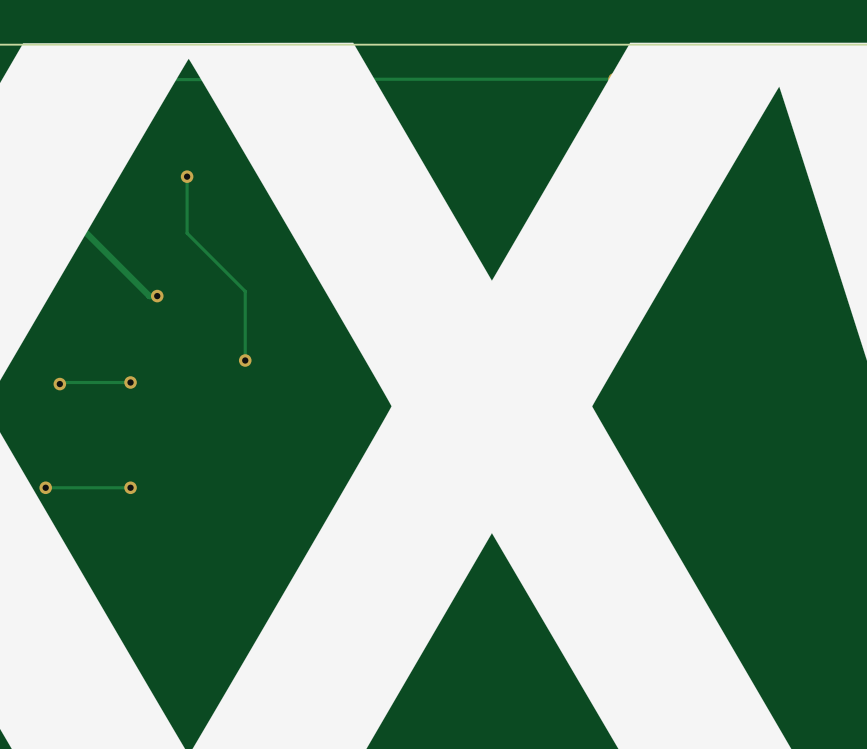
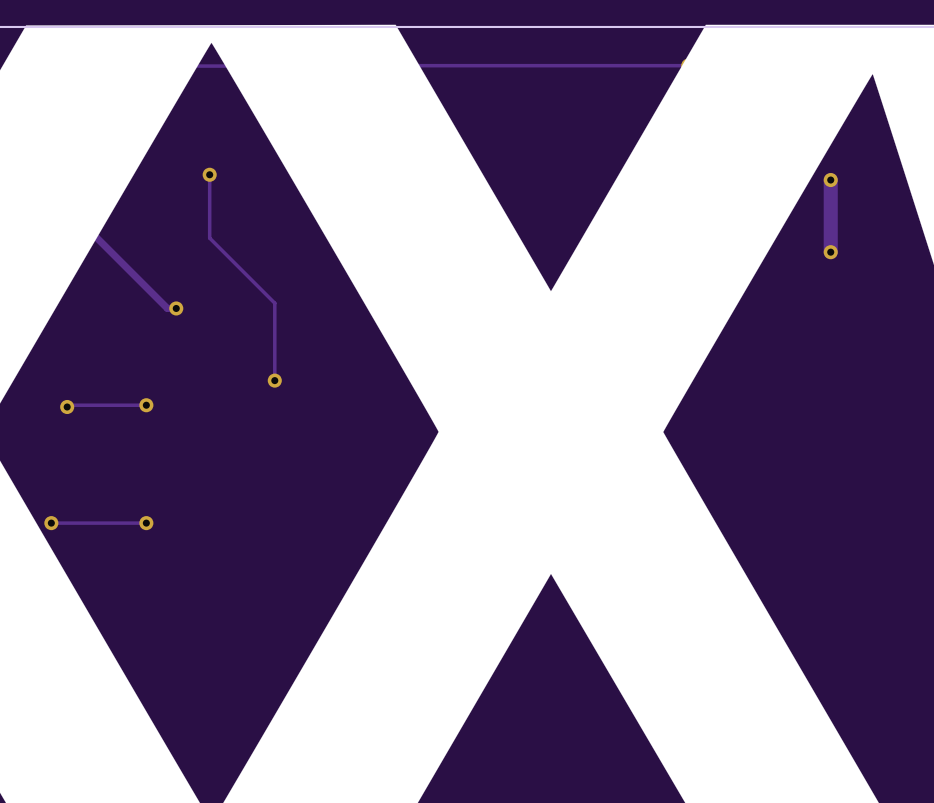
track: none -> (830, 180) (830, 252)
via: none -> (830, 180)
via: none -> (830, 252)

